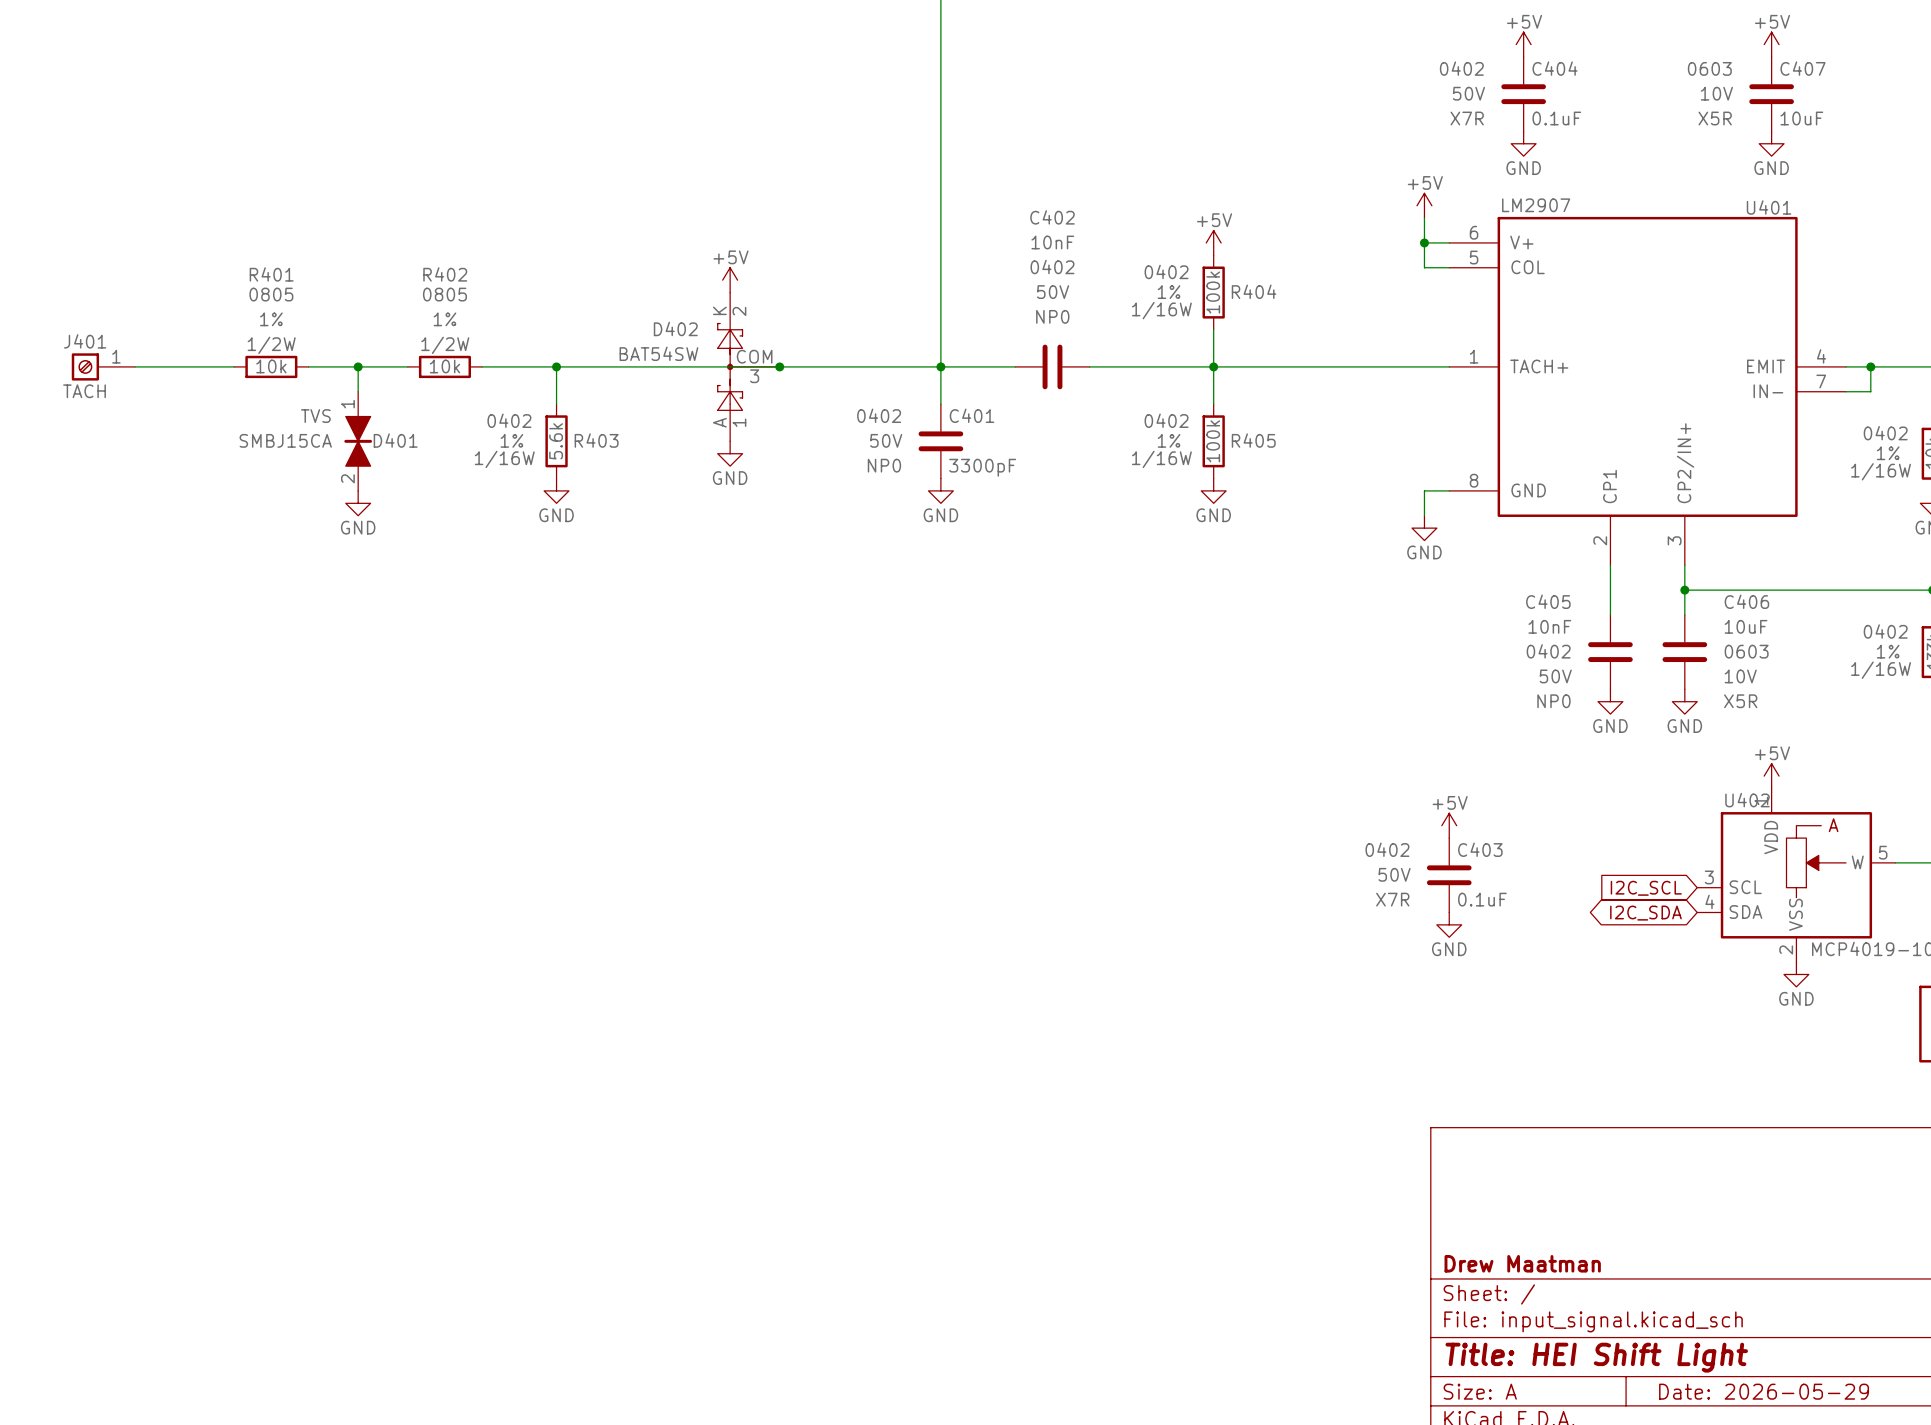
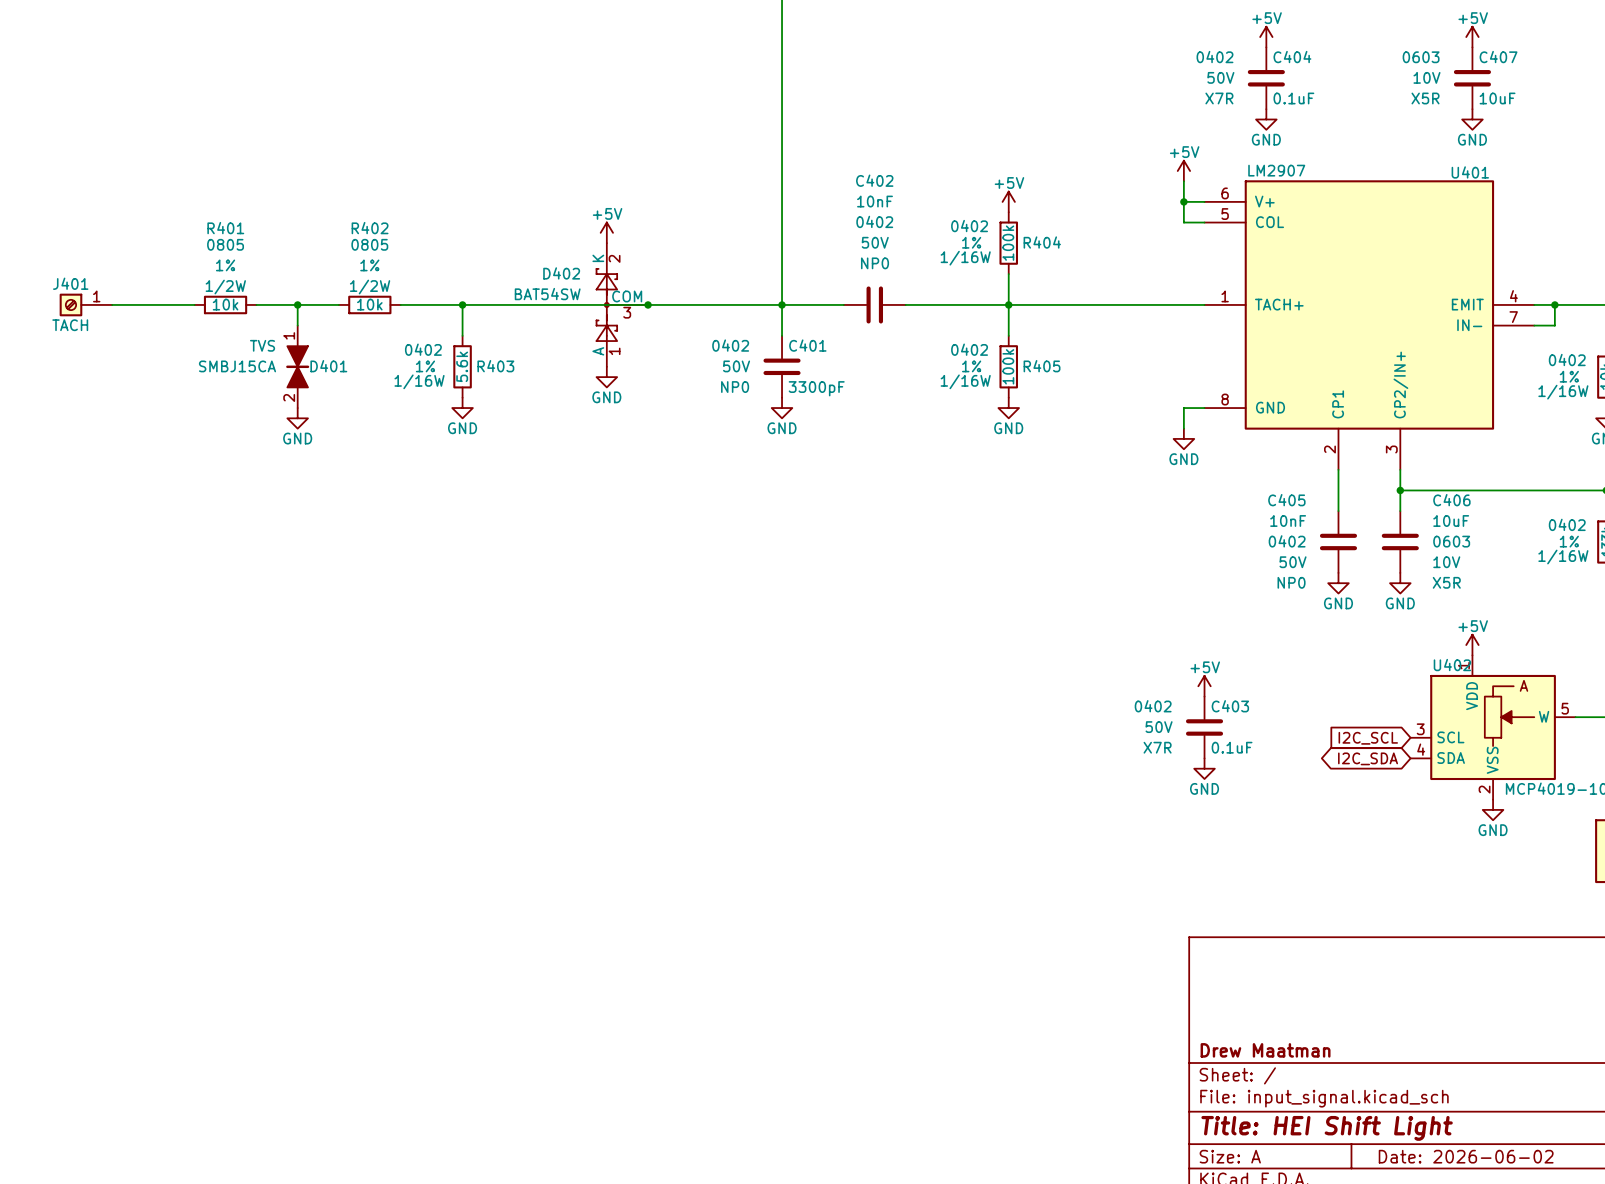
title block: Date: 2026-05-29 (1764, 1391) -> Date: 2026-06-02 (1466, 1156)

